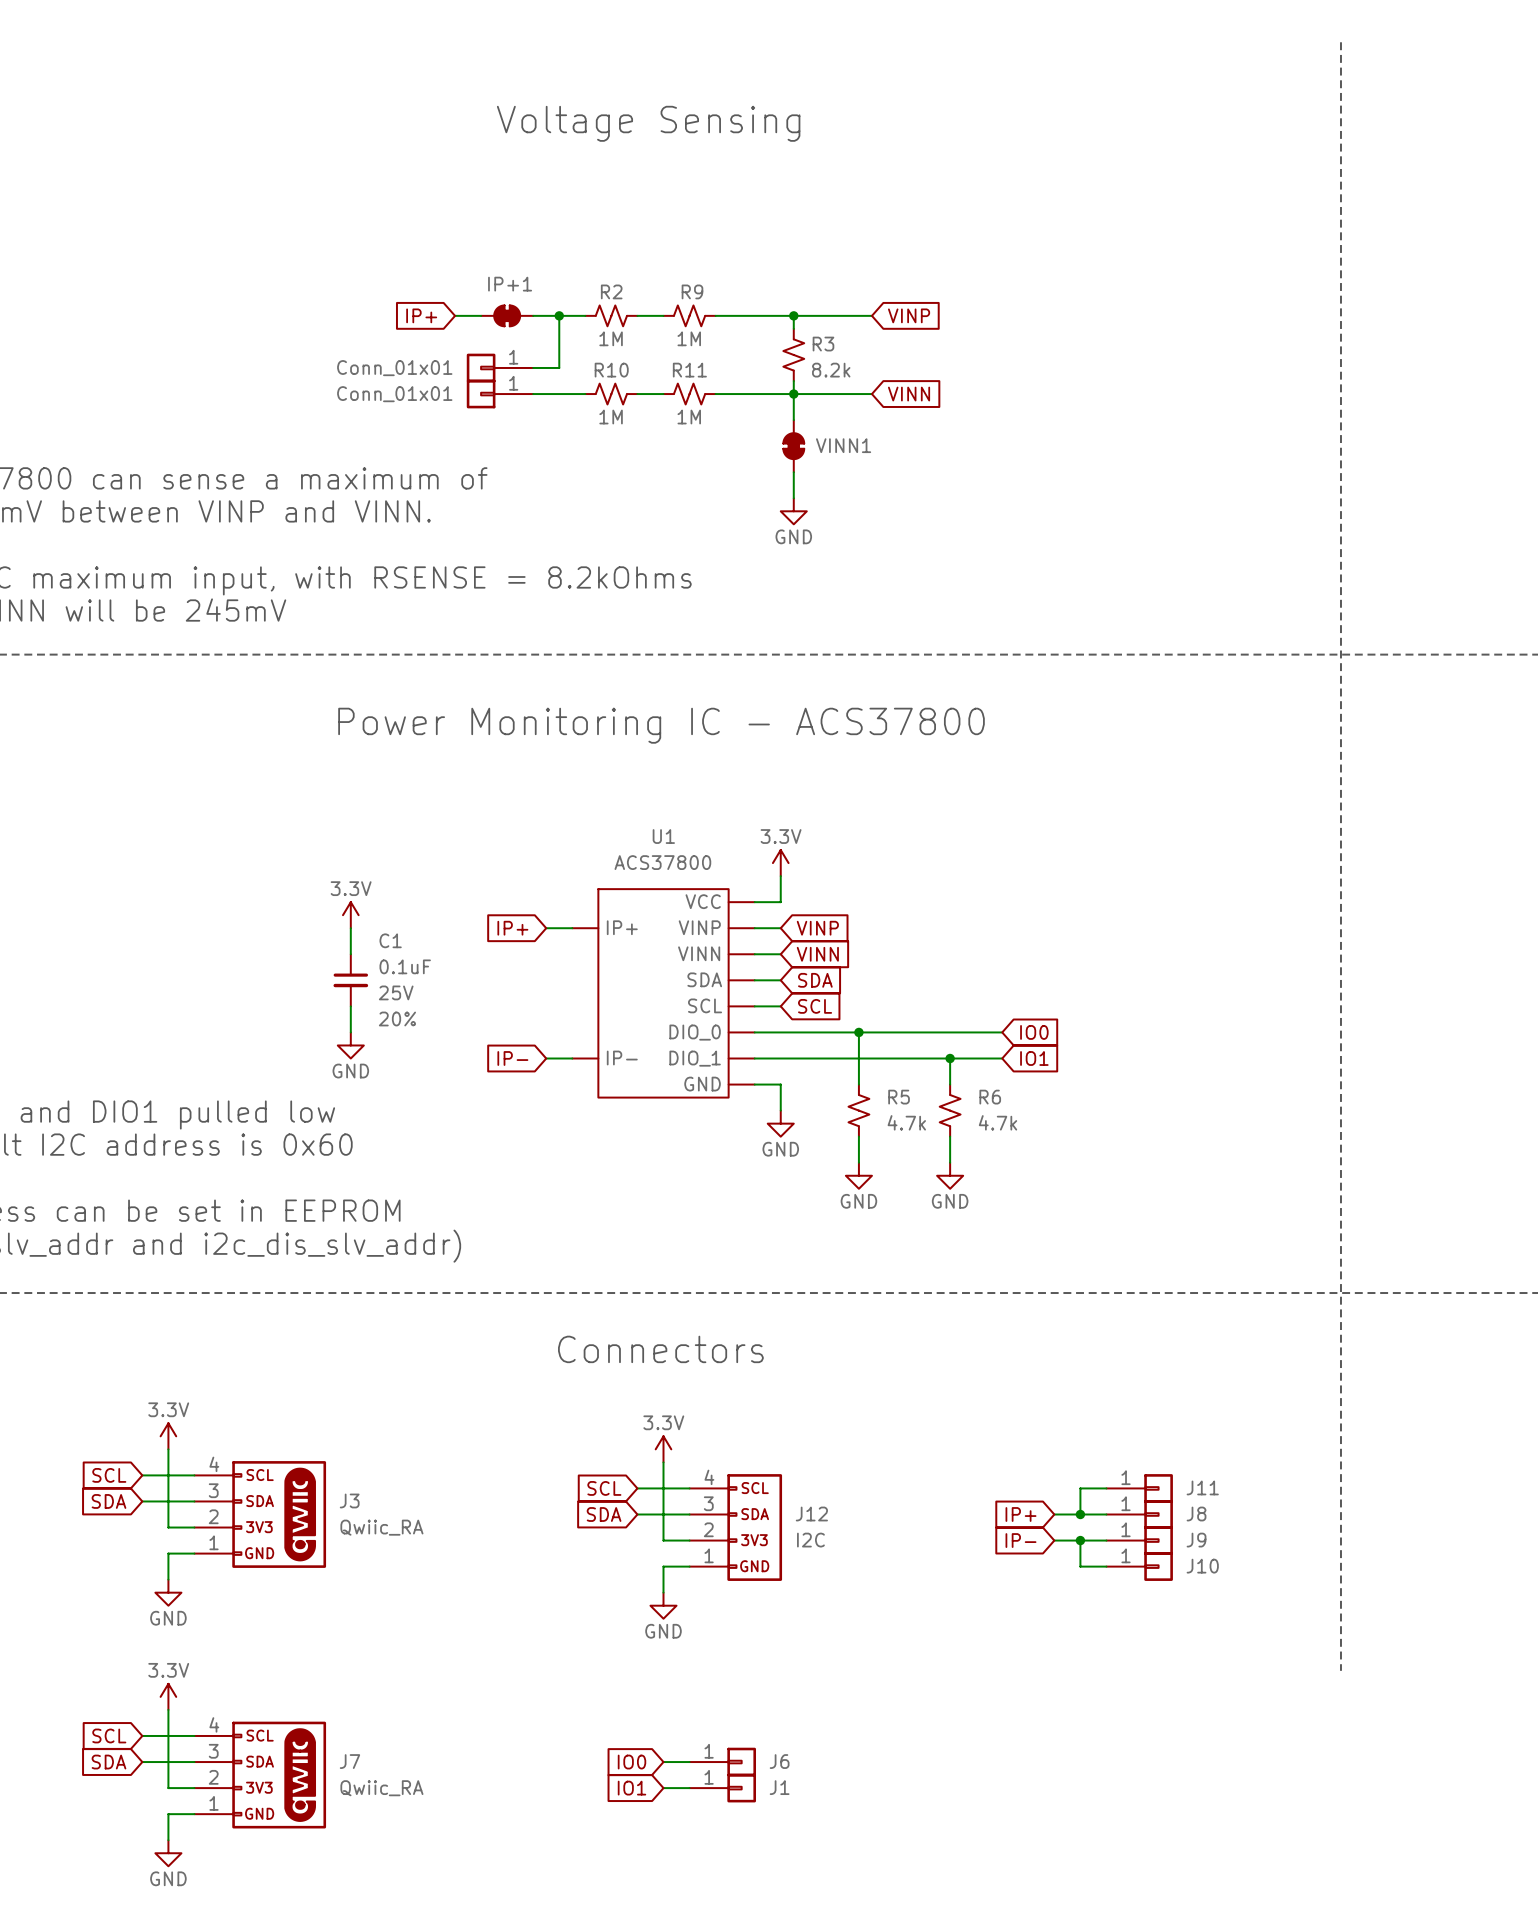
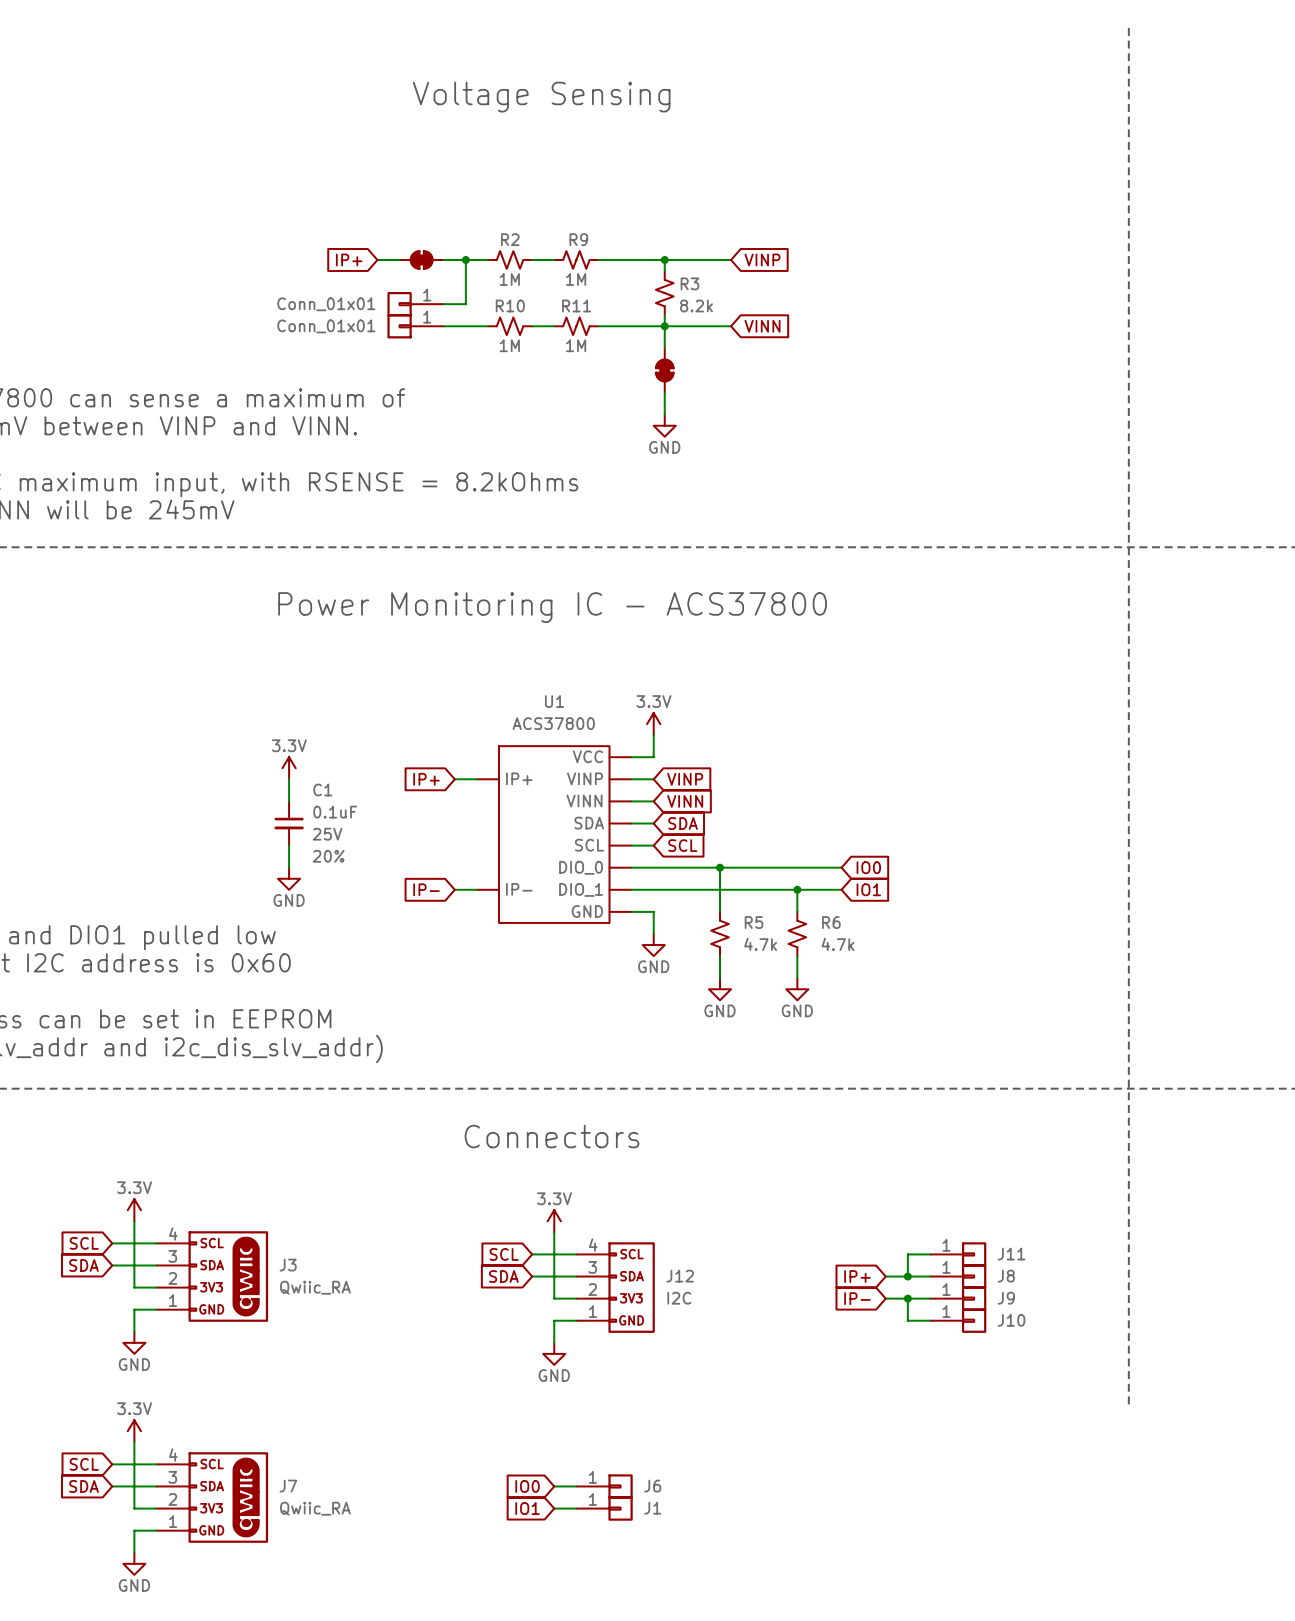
IP+1 name: IP+1 (510, 284) -> none
VINN1 name: VINN1 (843, 445) -> none

